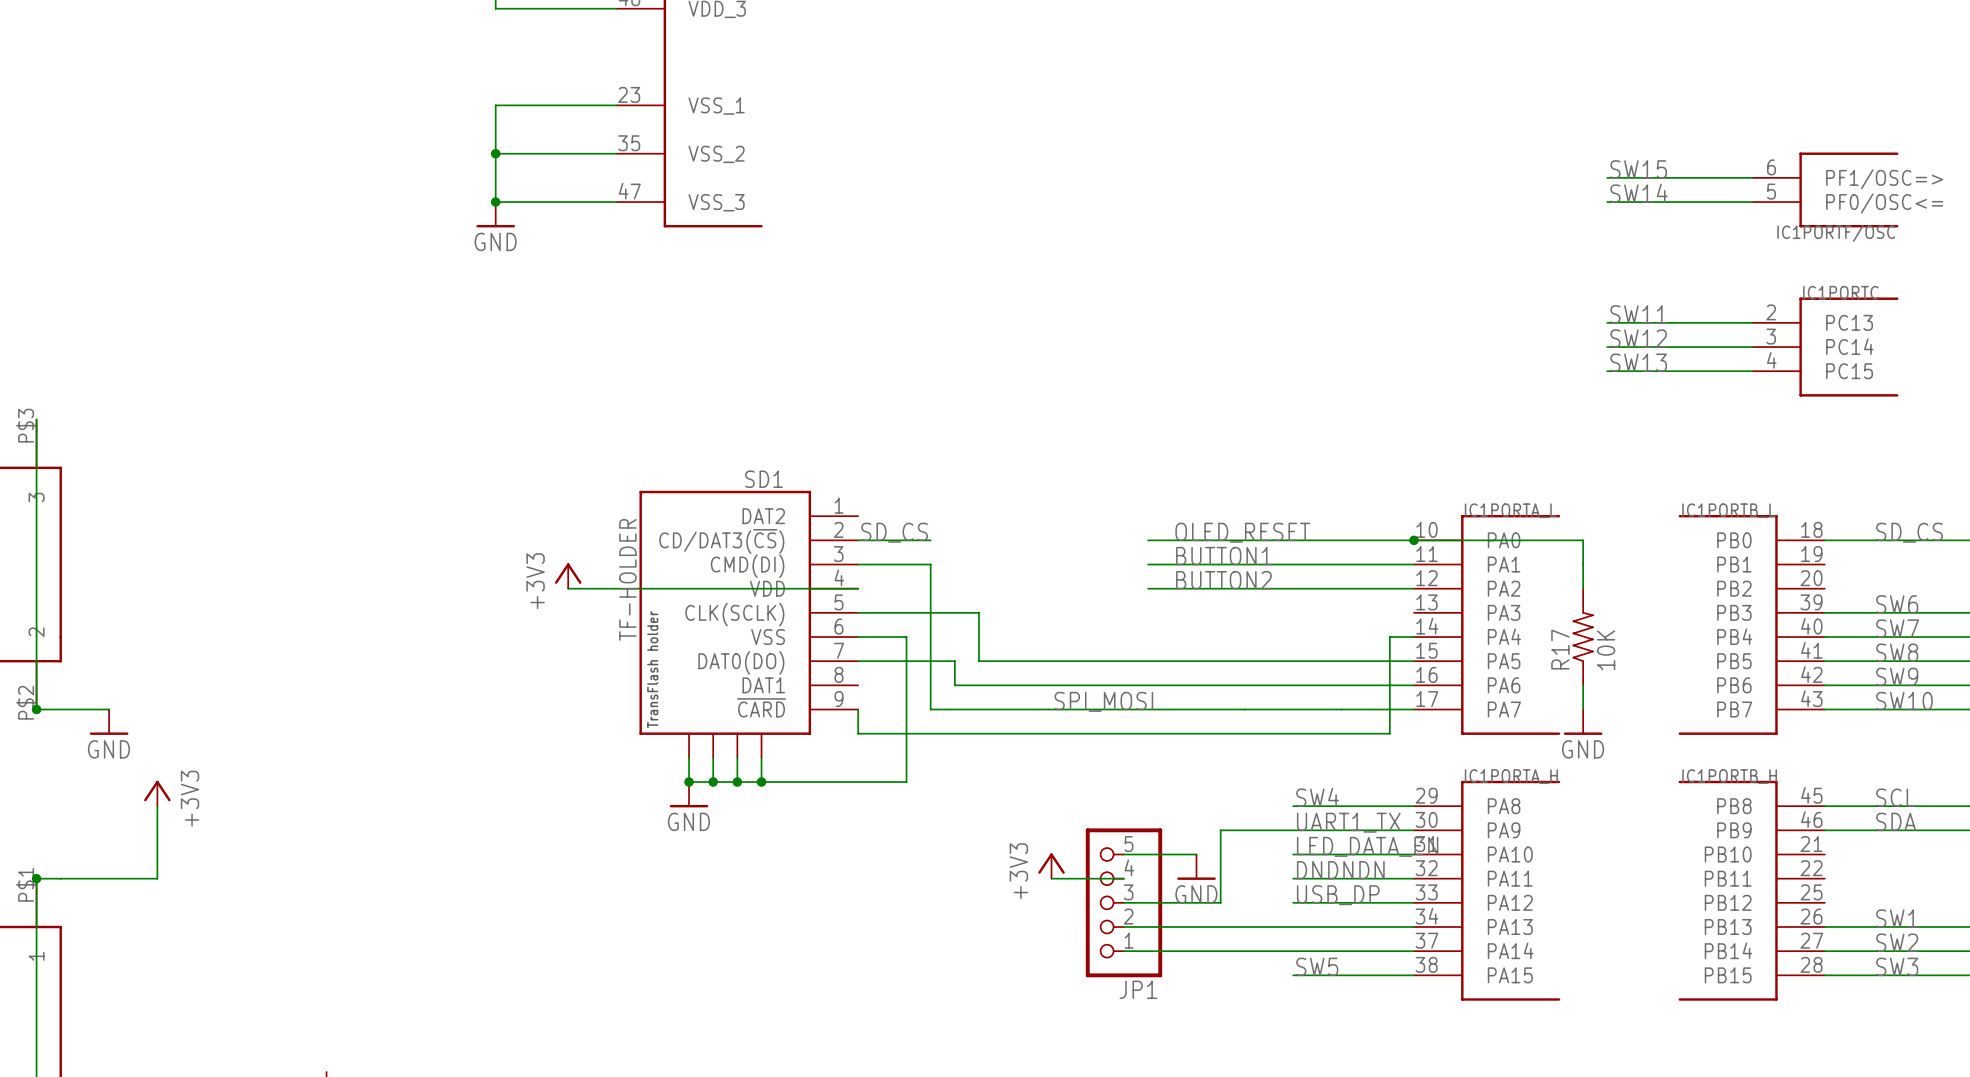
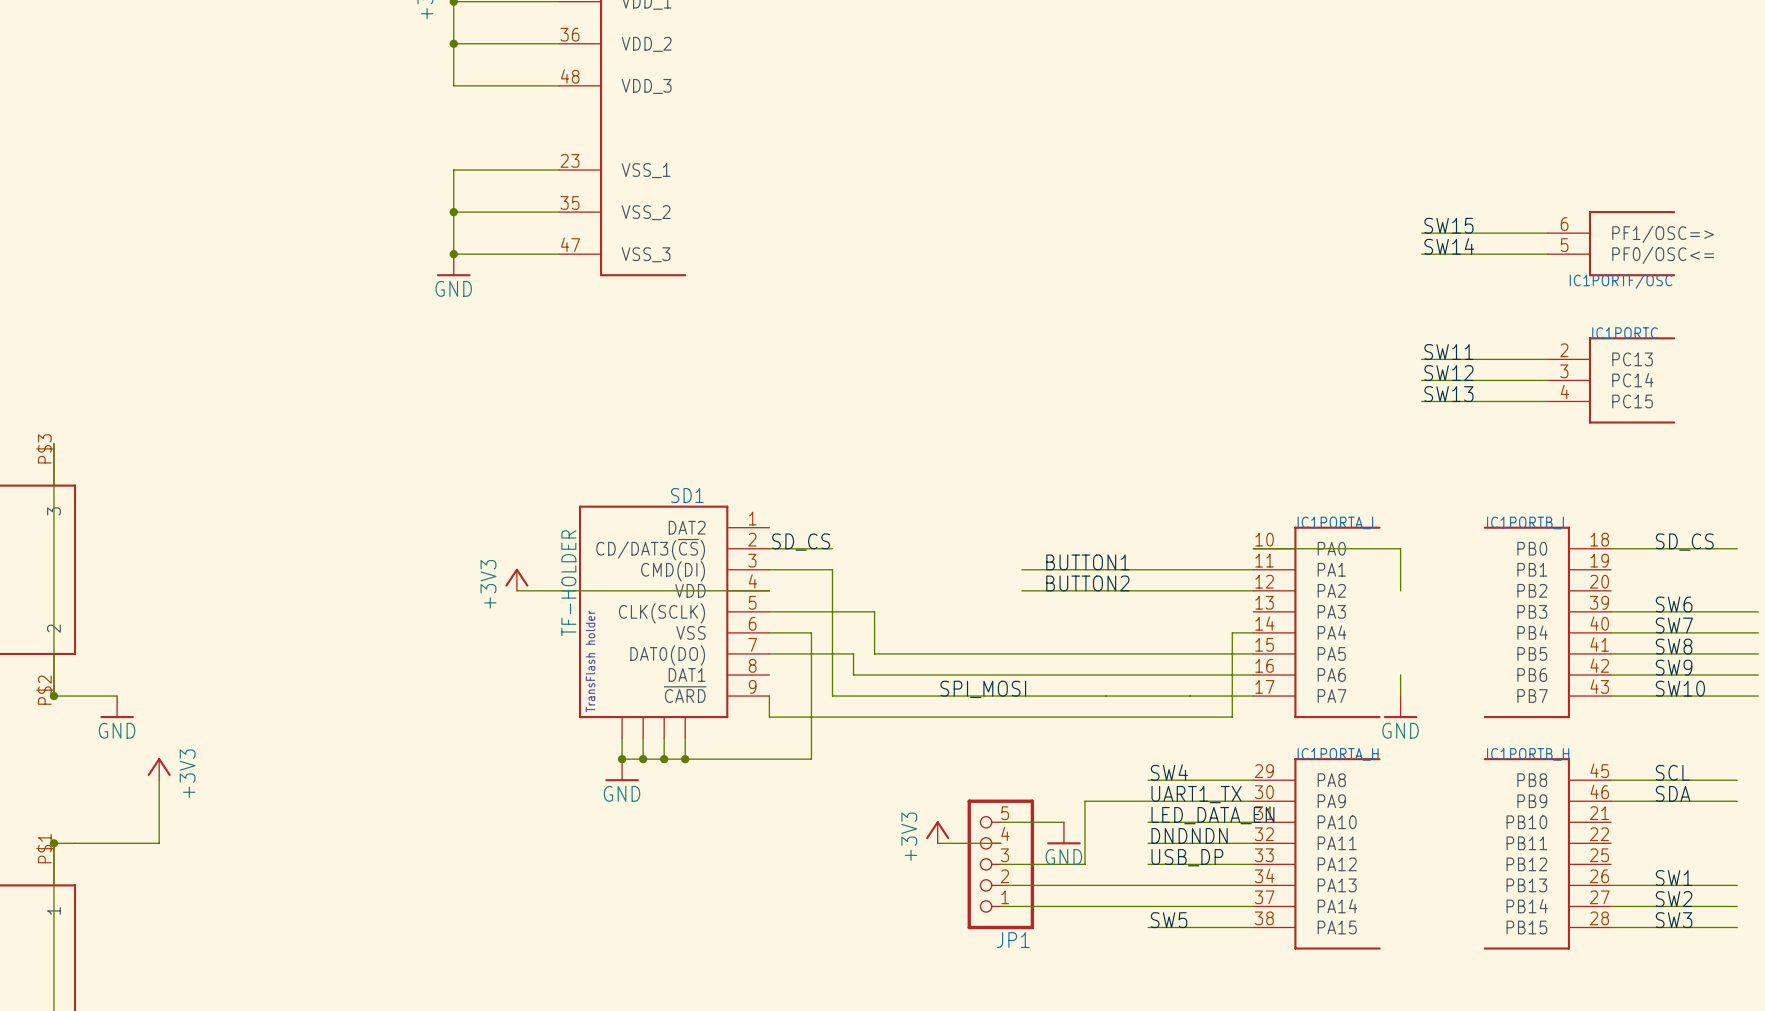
label: OLED_RESET (1242, 532) -> none
wire: (1148, 540) (1413, 540) -> none
junction: (1413, 540) -> none
R17: 10K (1583, 637) -> none

